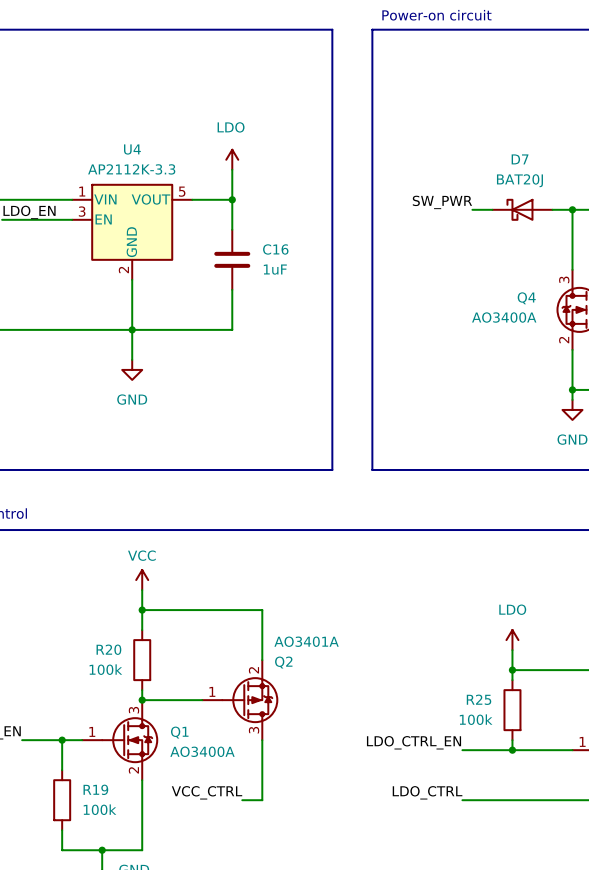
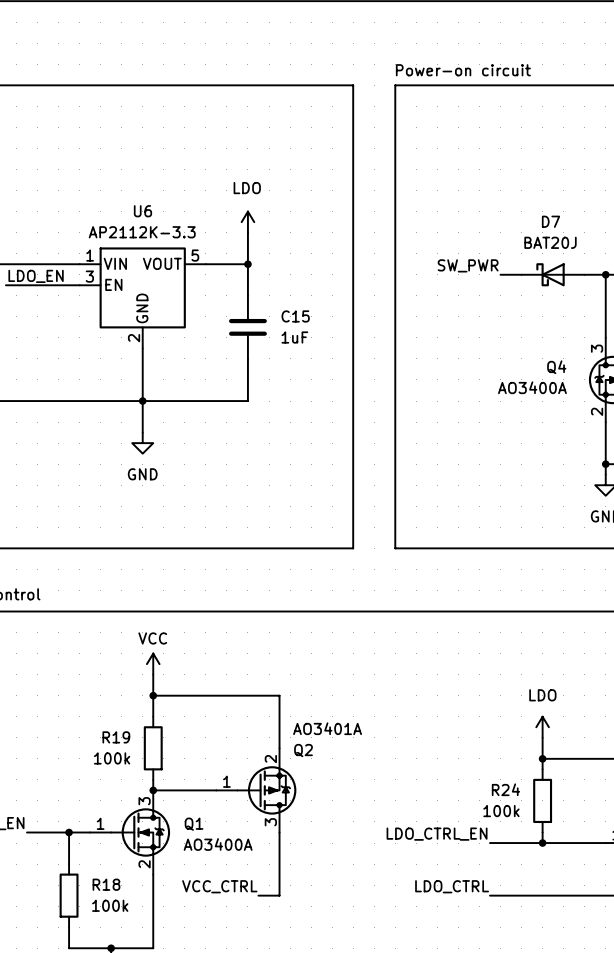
U4 name: U4 (132, 149) -> U6 (142, 211)
C16 name: C16 (275, 249) -> C15 (295, 316)
R20 name: R20 (108, 649) -> R19 (116, 737)
R25 name: R25 (479, 699) -> R24 (505, 789)
R19 name: R19 (95, 789) -> R18 (106, 884)

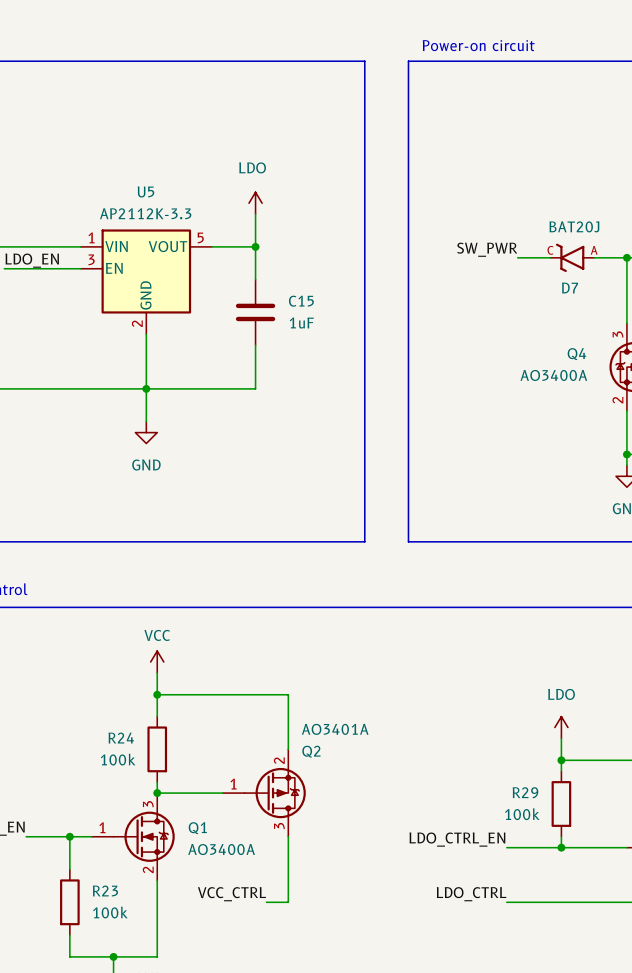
U6 name: U6 (142, 211) -> U5 (145, 191)
D7 name position: D7 (551, 221) -> D7 (570, 288)
D7 symbol: [521, 263, 585, 287] -> [549, 243, 595, 273]
R19 name: R19 (116, 737) -> R24 (121, 738)
R24 name: R24 (505, 789) -> R29 (525, 792)
R18 name: R18 (106, 884) -> R23 (105, 890)

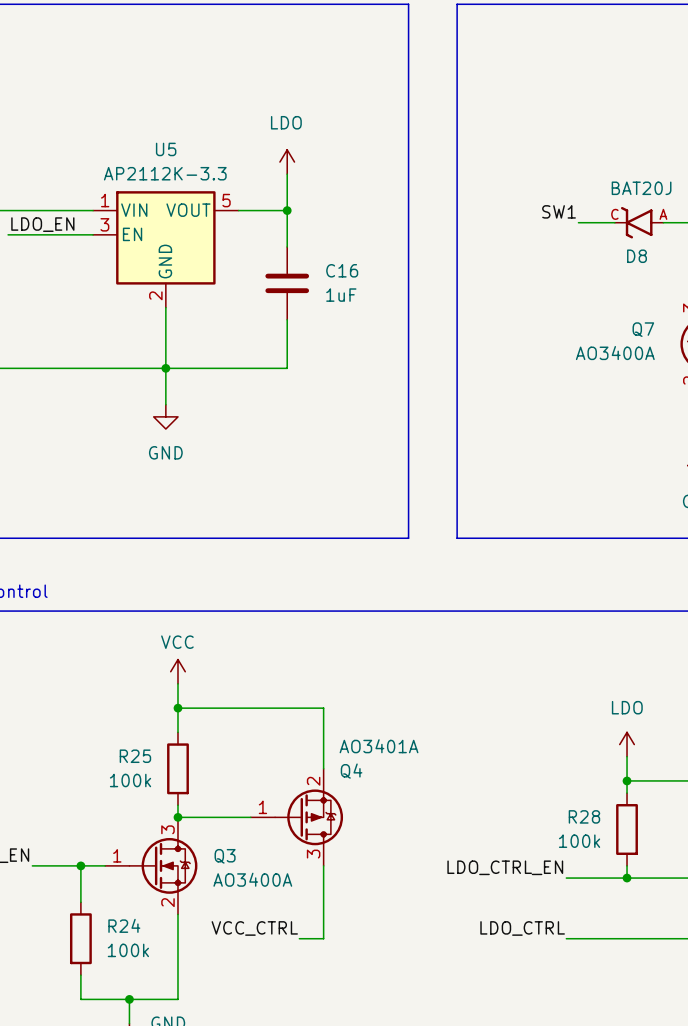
label: SW_PWR (487, 249) -> SW1 (559, 211)
D7 name: D7 (570, 288) -> D8 (637, 256)
C15 name: C15 (301, 301) -> C16 (342, 270)
Q4 name: Q4 (576, 354) -> Q7 (643, 329)
R24 name: R24 (121, 738) -> R25 (135, 756)
Q2 name: Q2 (311, 751) -> Q4 (351, 771)
R29 name: R29 (525, 792) -> R28 (584, 816)
Q1 name: Q1 (197, 828) -> Q3 (225, 856)
R23 name: R23 (105, 890) -> R24 (124, 925)

